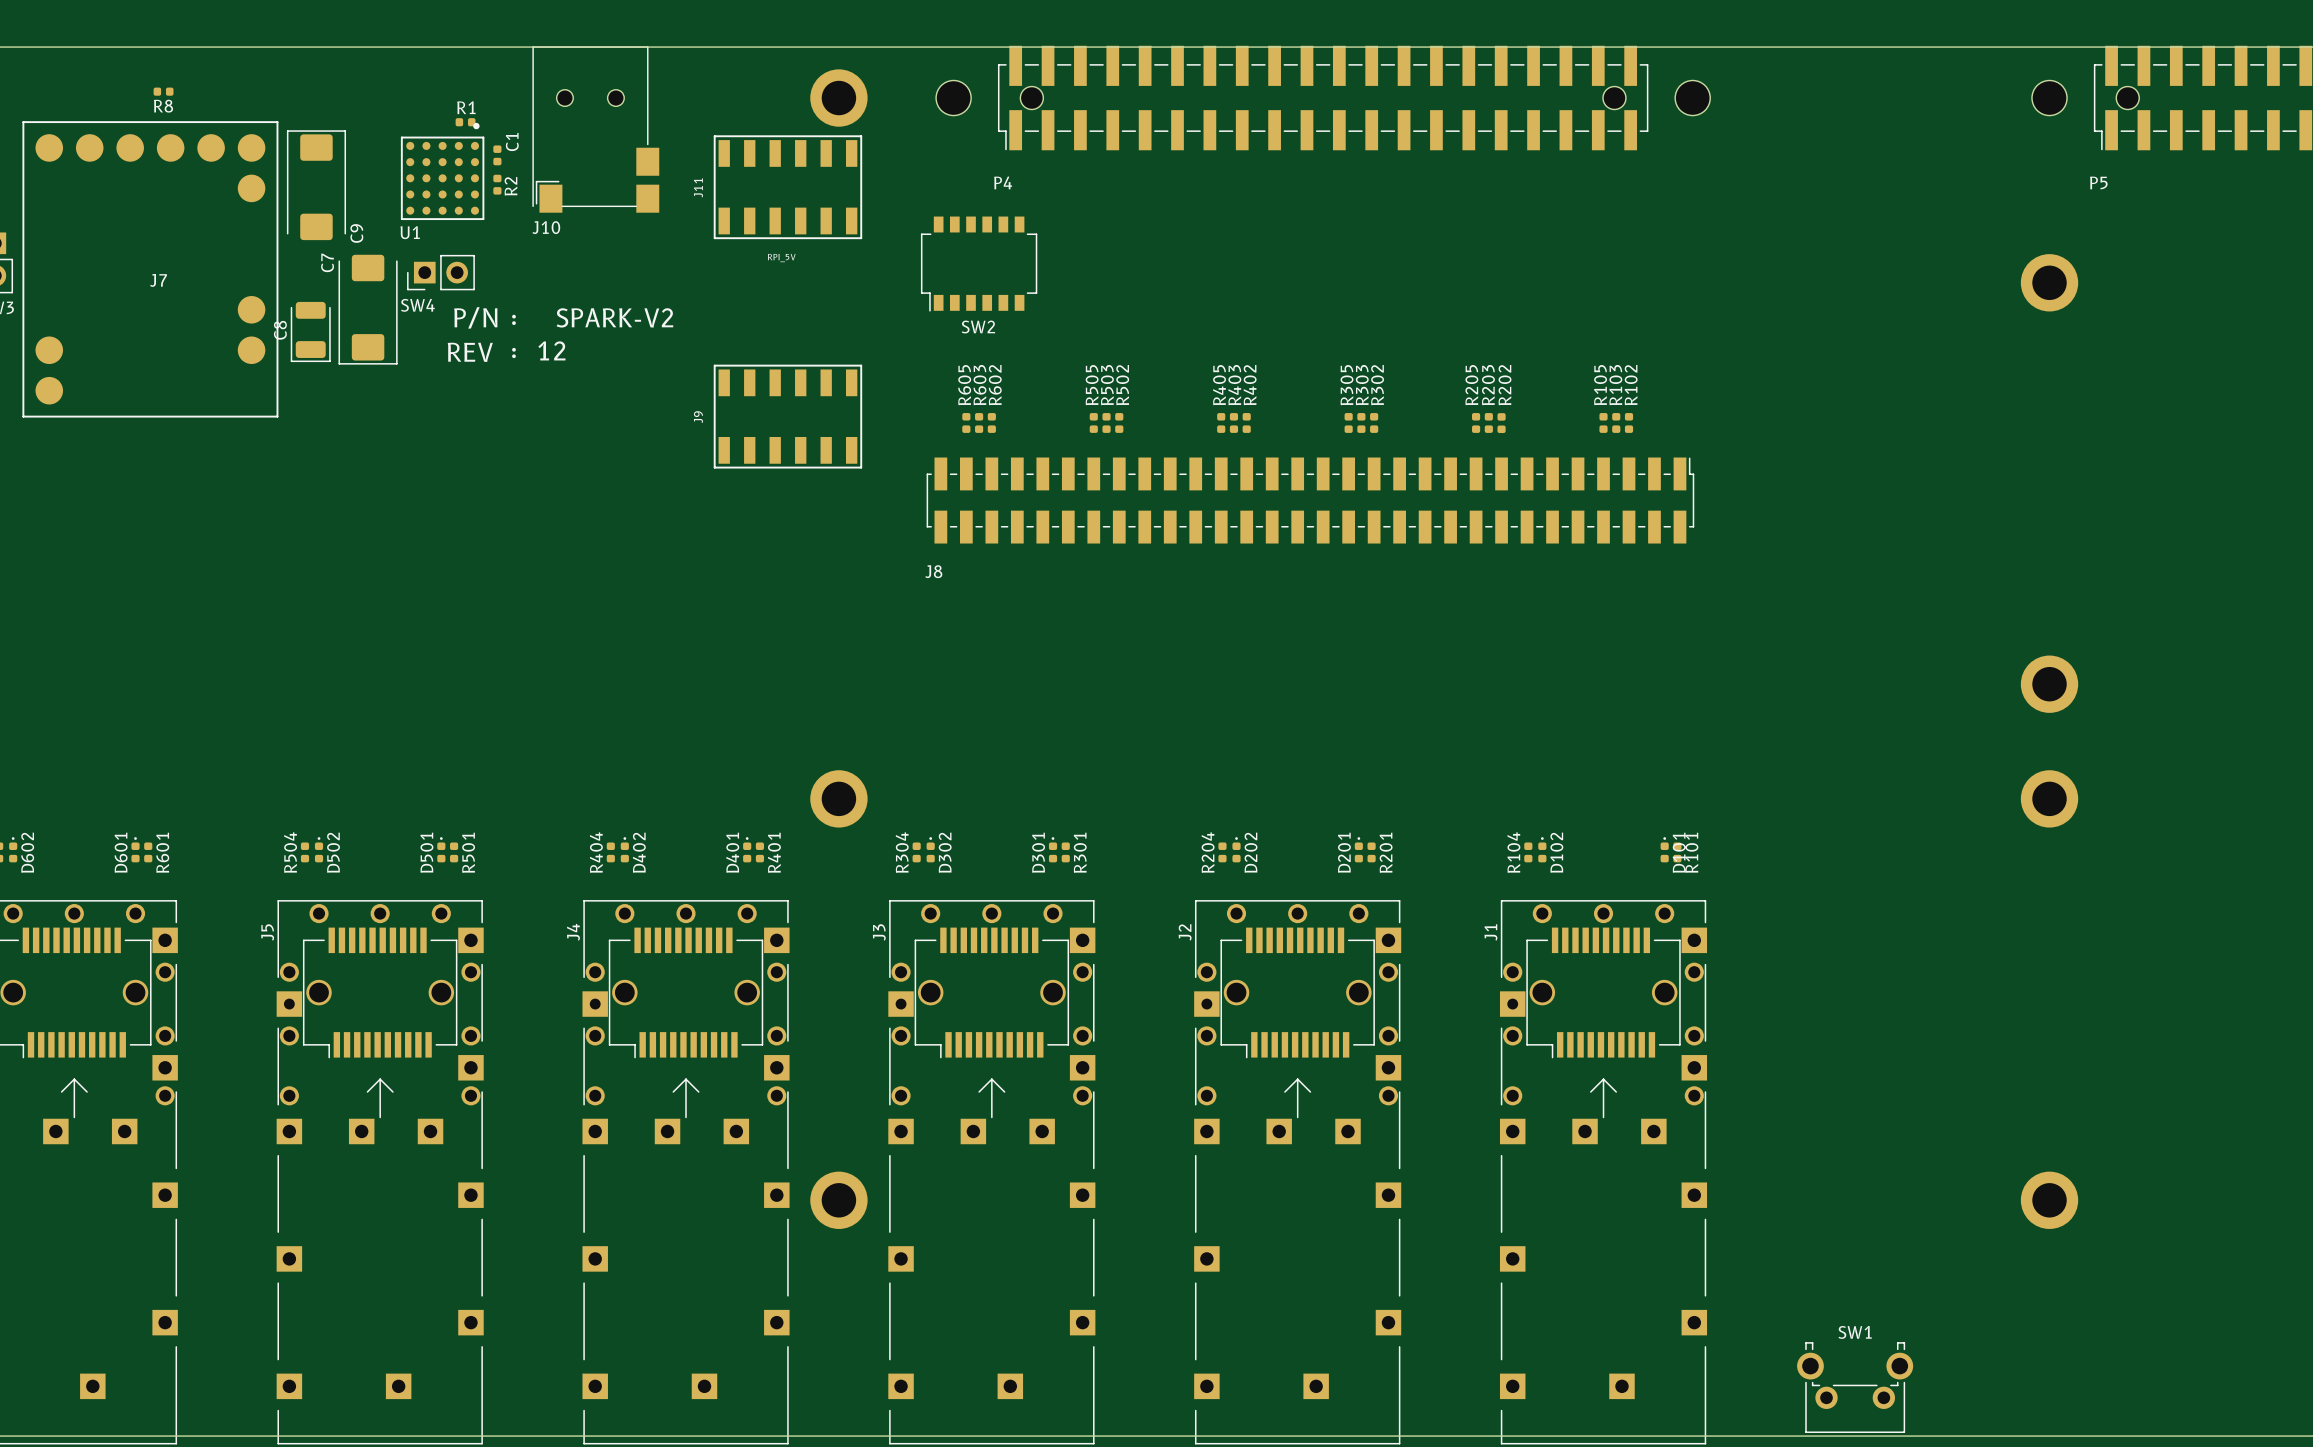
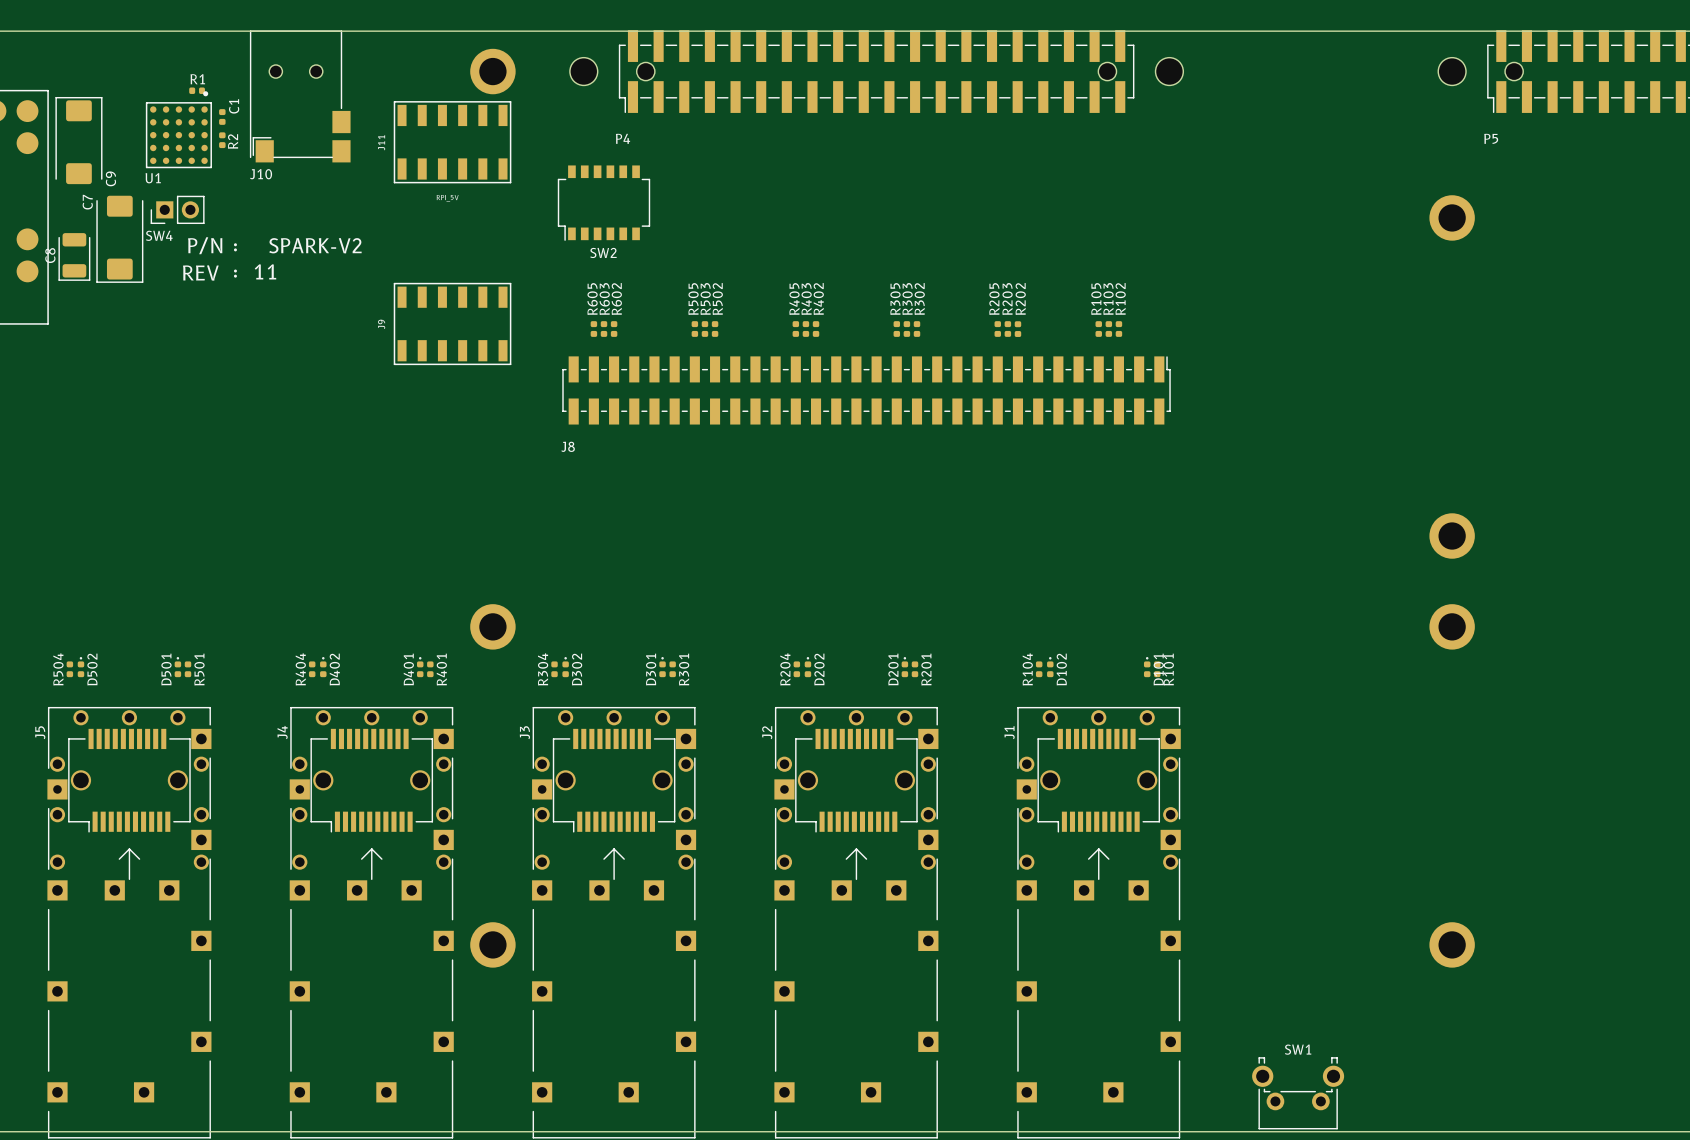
text: 12 (551, 350) -> 11 (265, 271)

